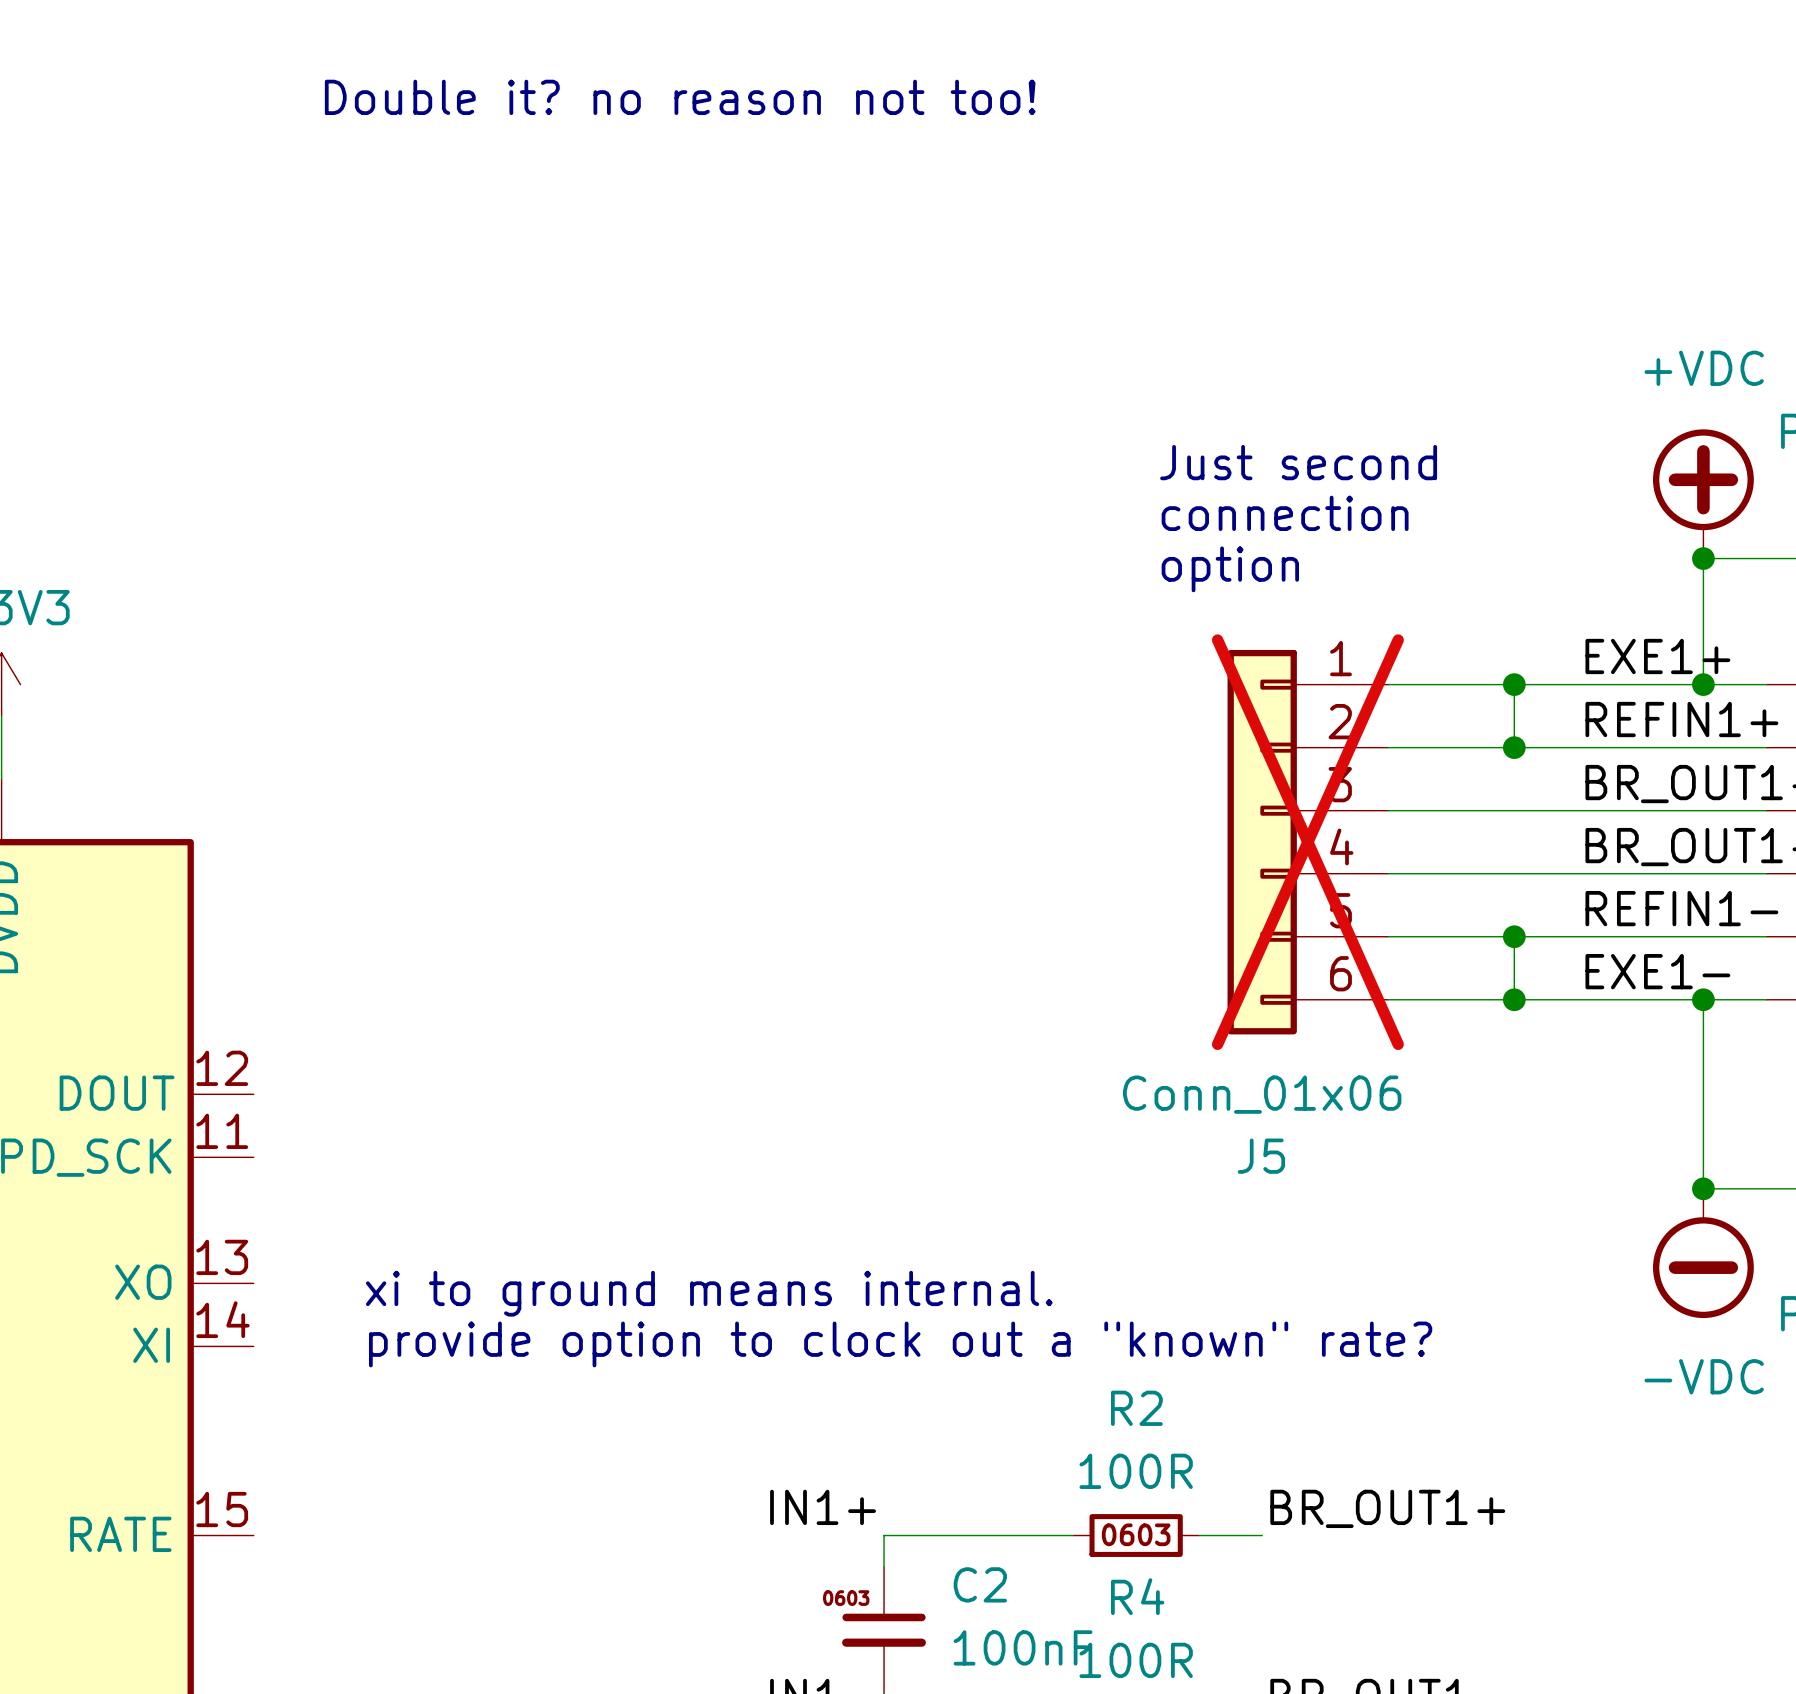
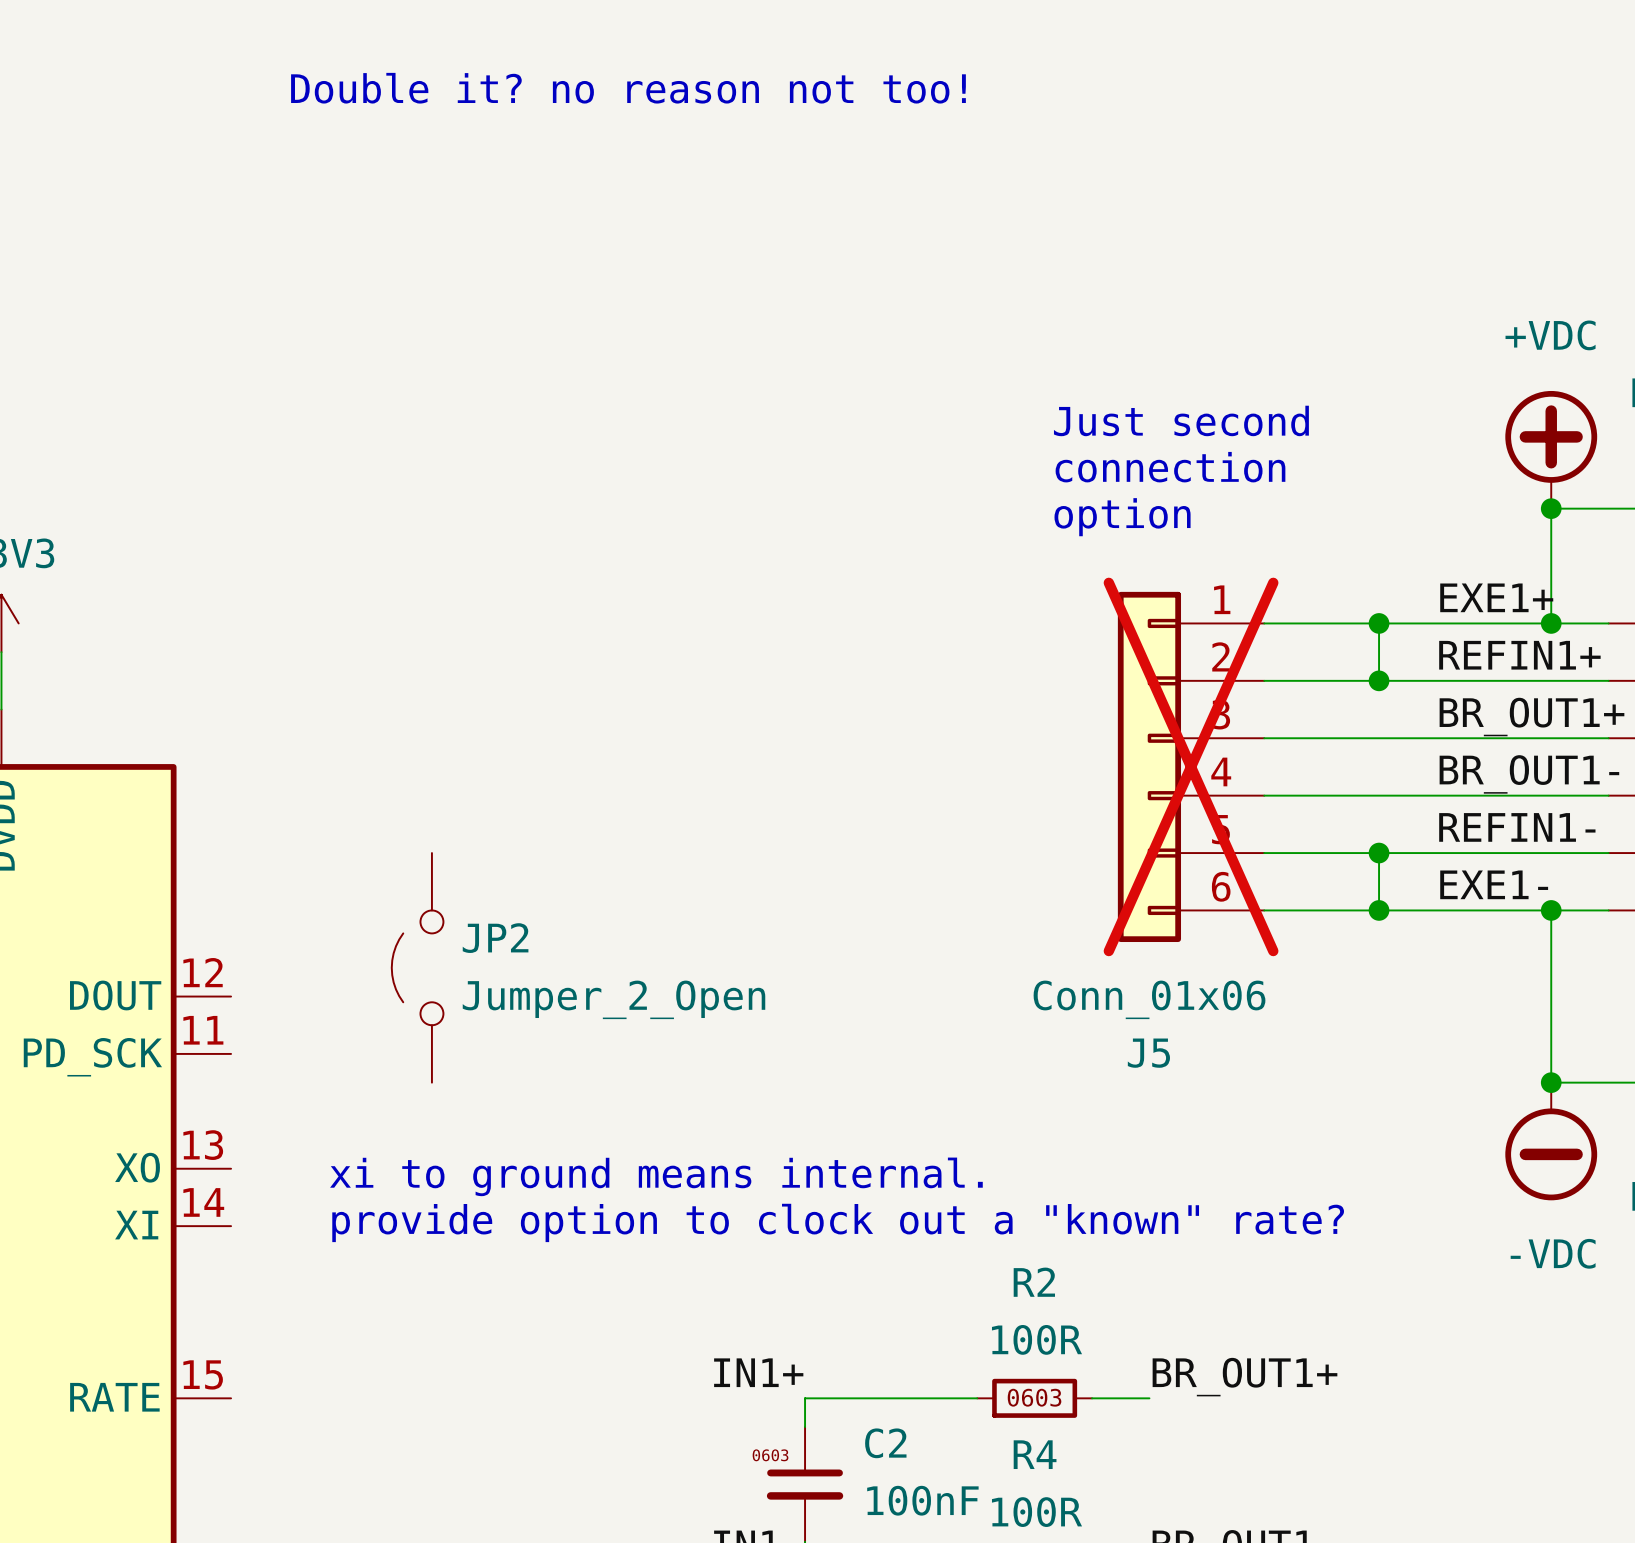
JP2: none -> Jumper_2_Open (417, 967)

